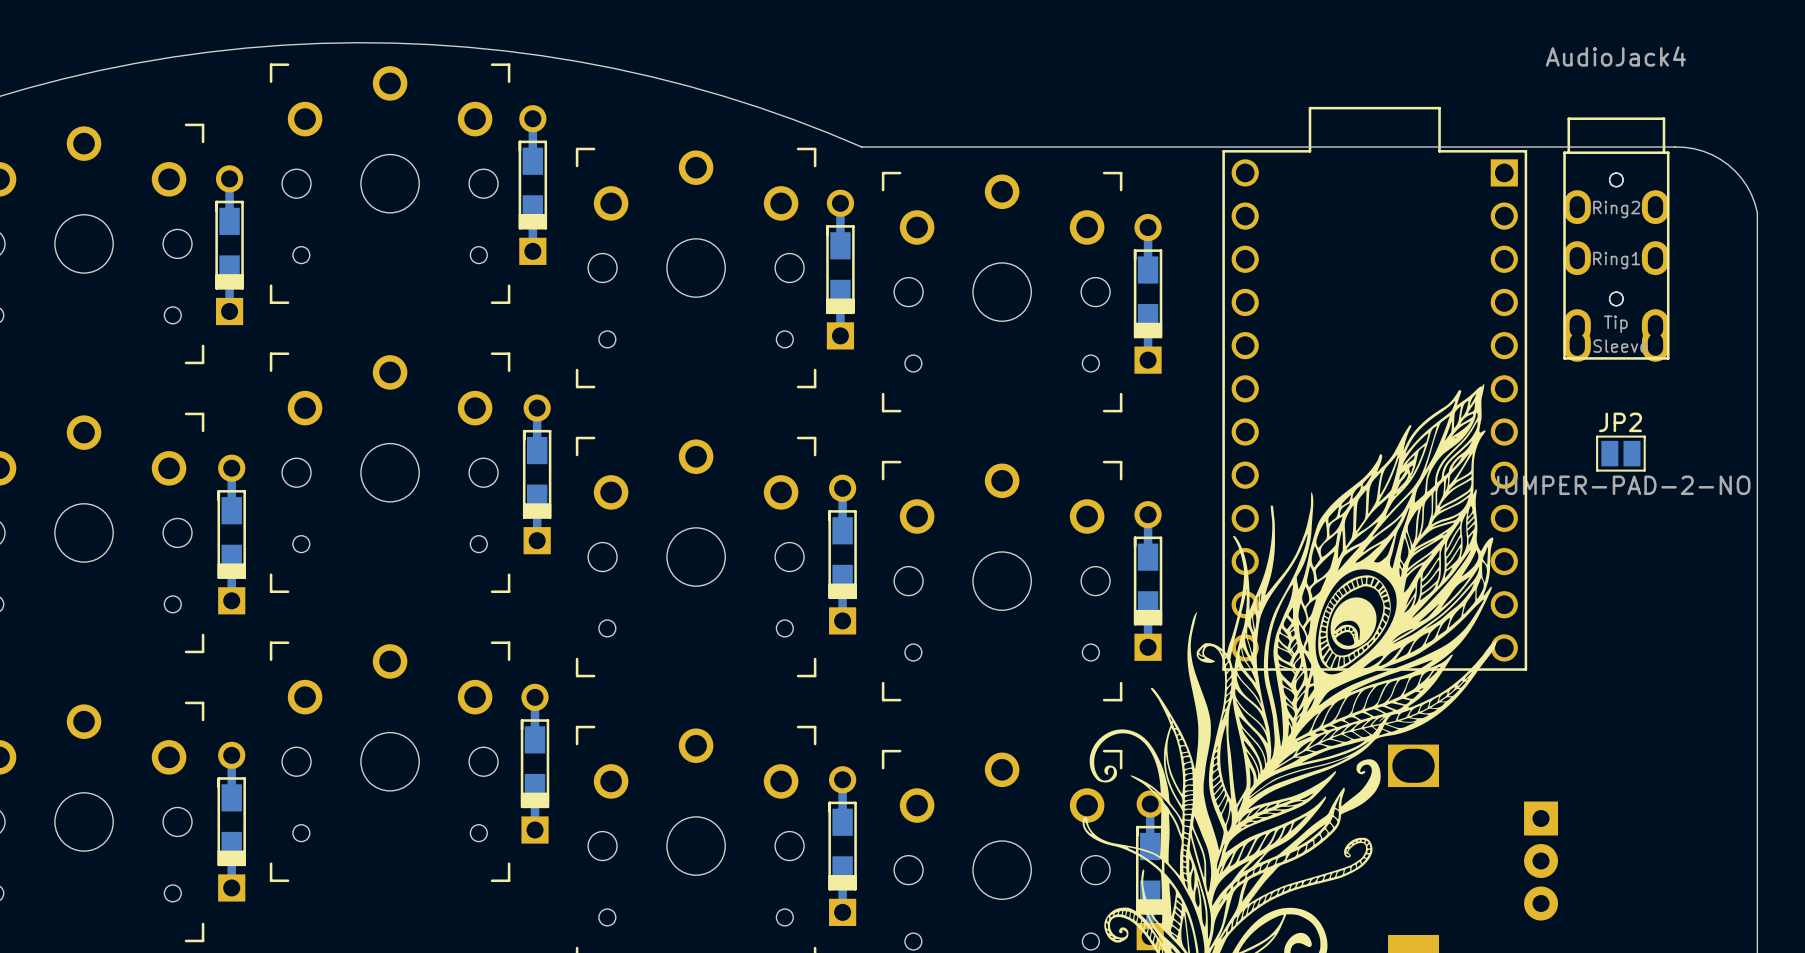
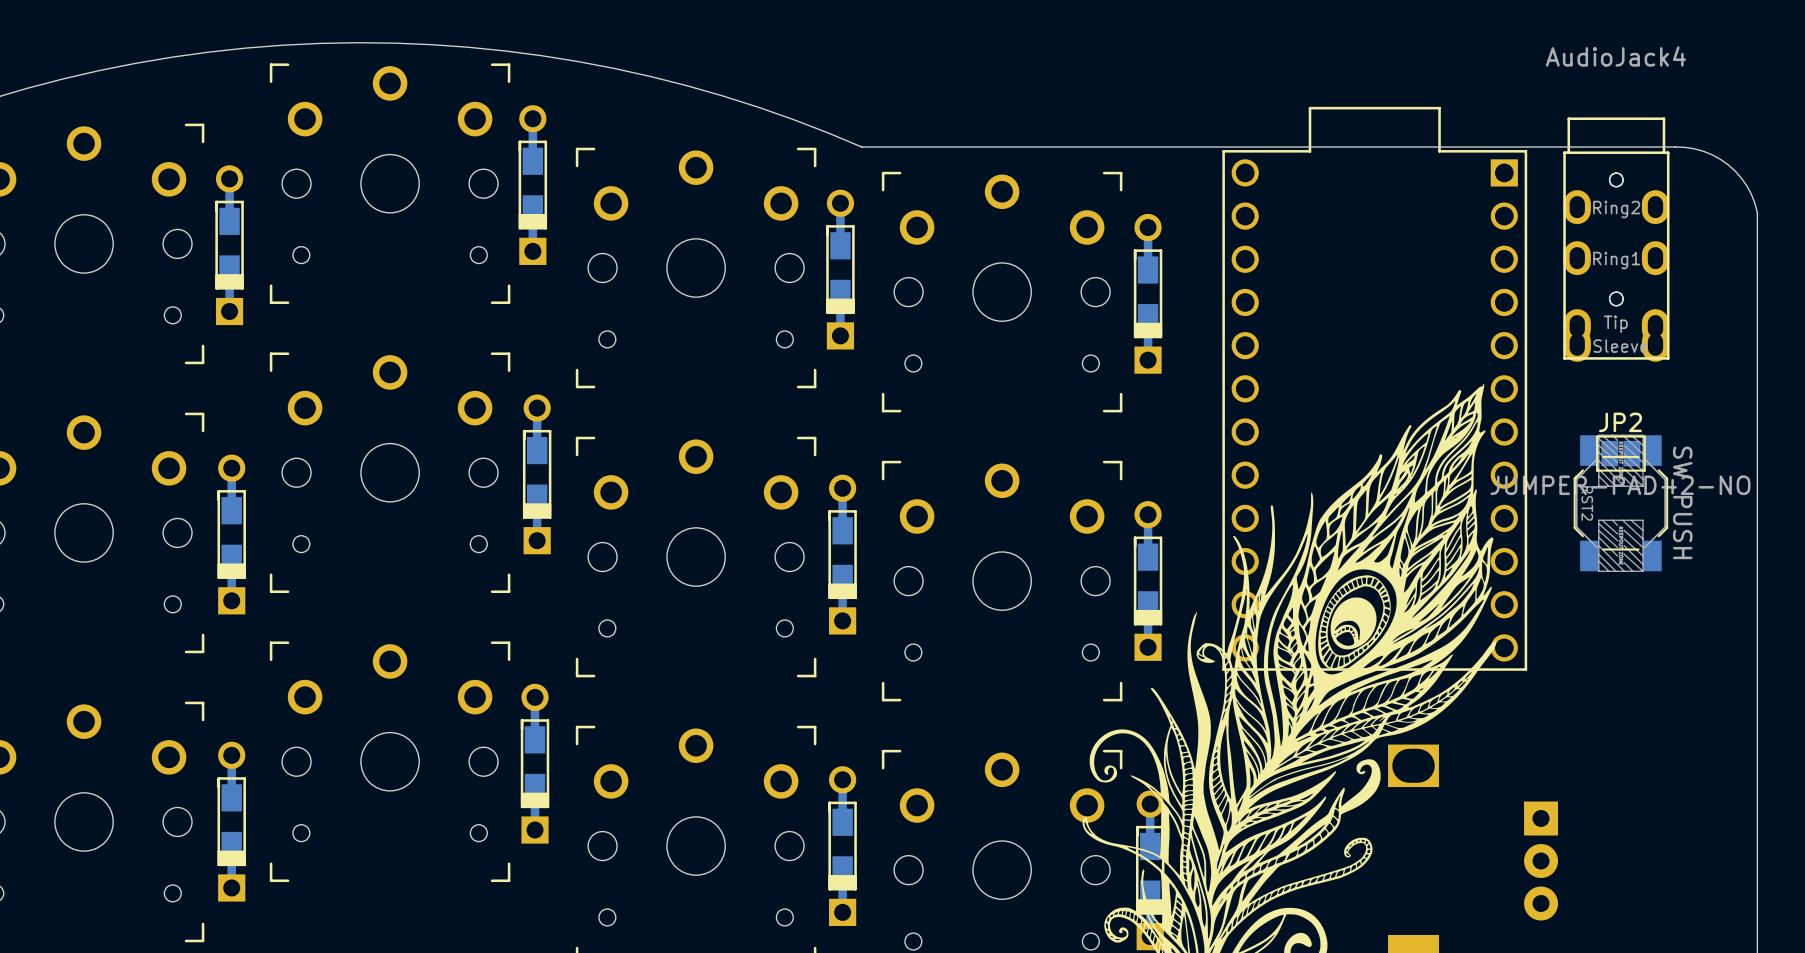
RST2: none -> SW_PUSH (1620, 503)

